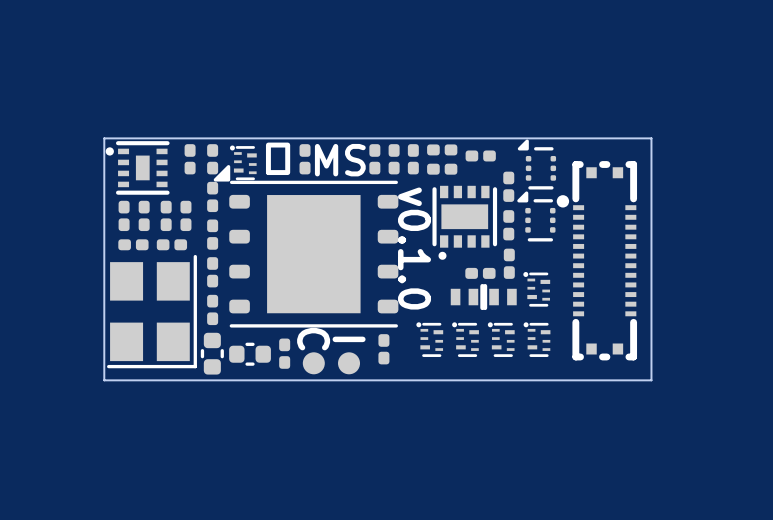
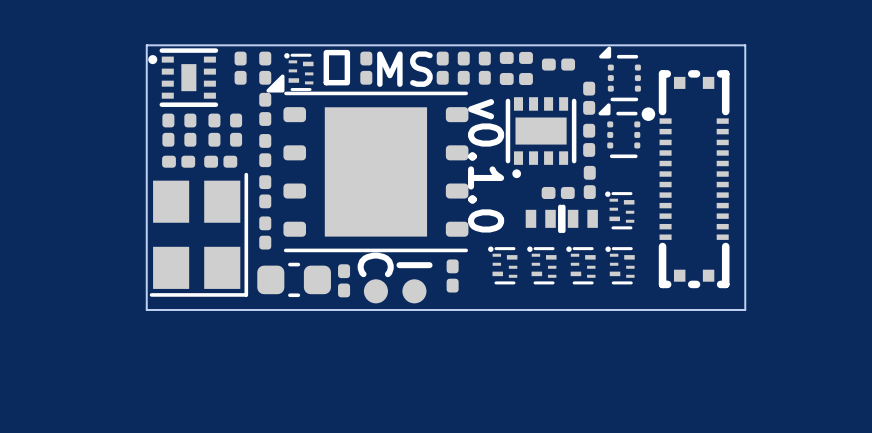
part footprint: [229, 342, 271, 366] -> [257, 262, 331, 298]
part: (212, 353) -> none

